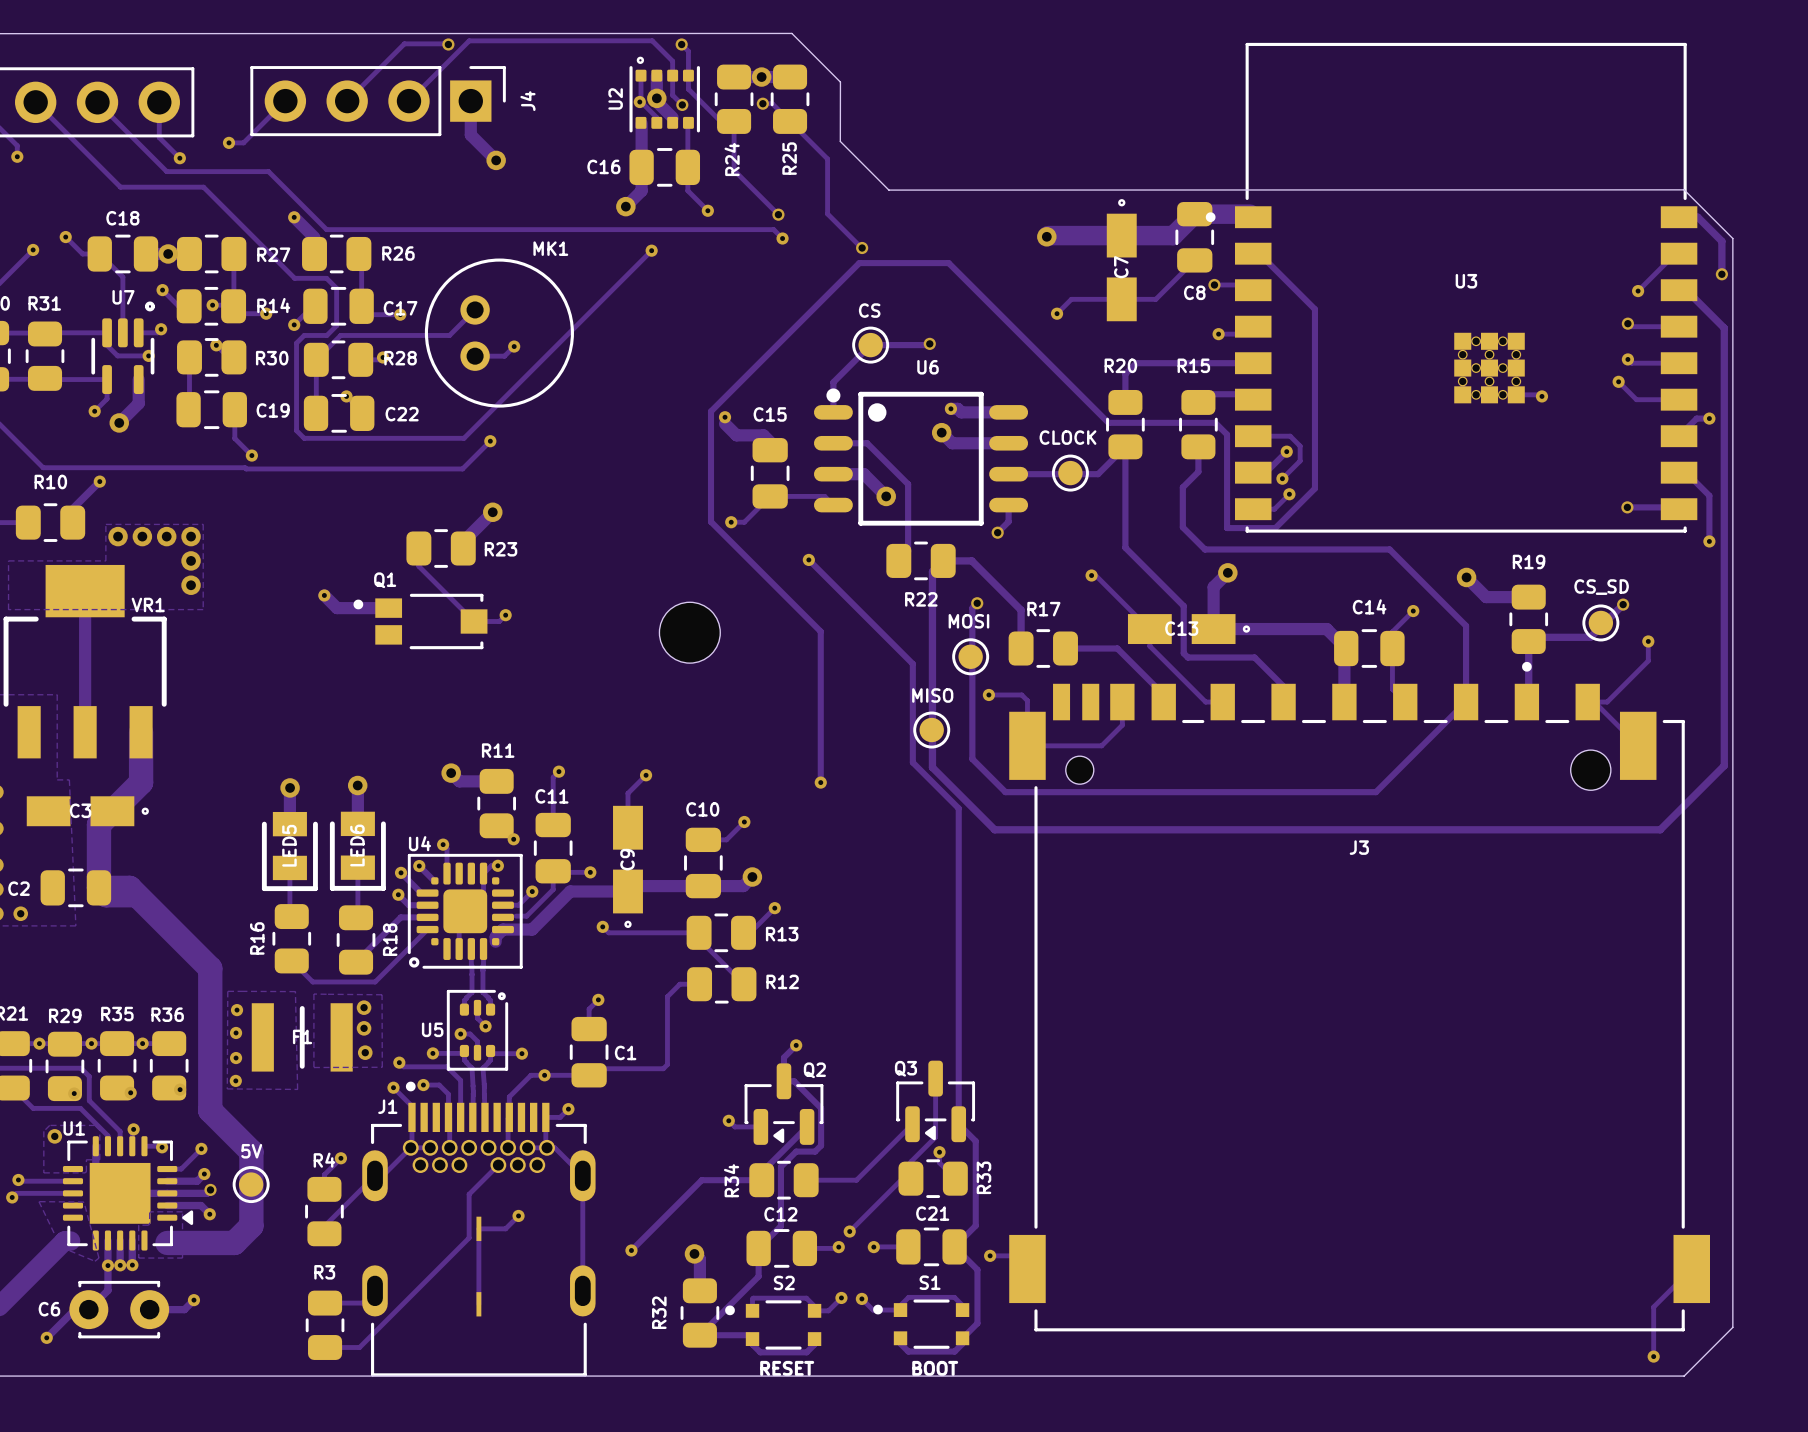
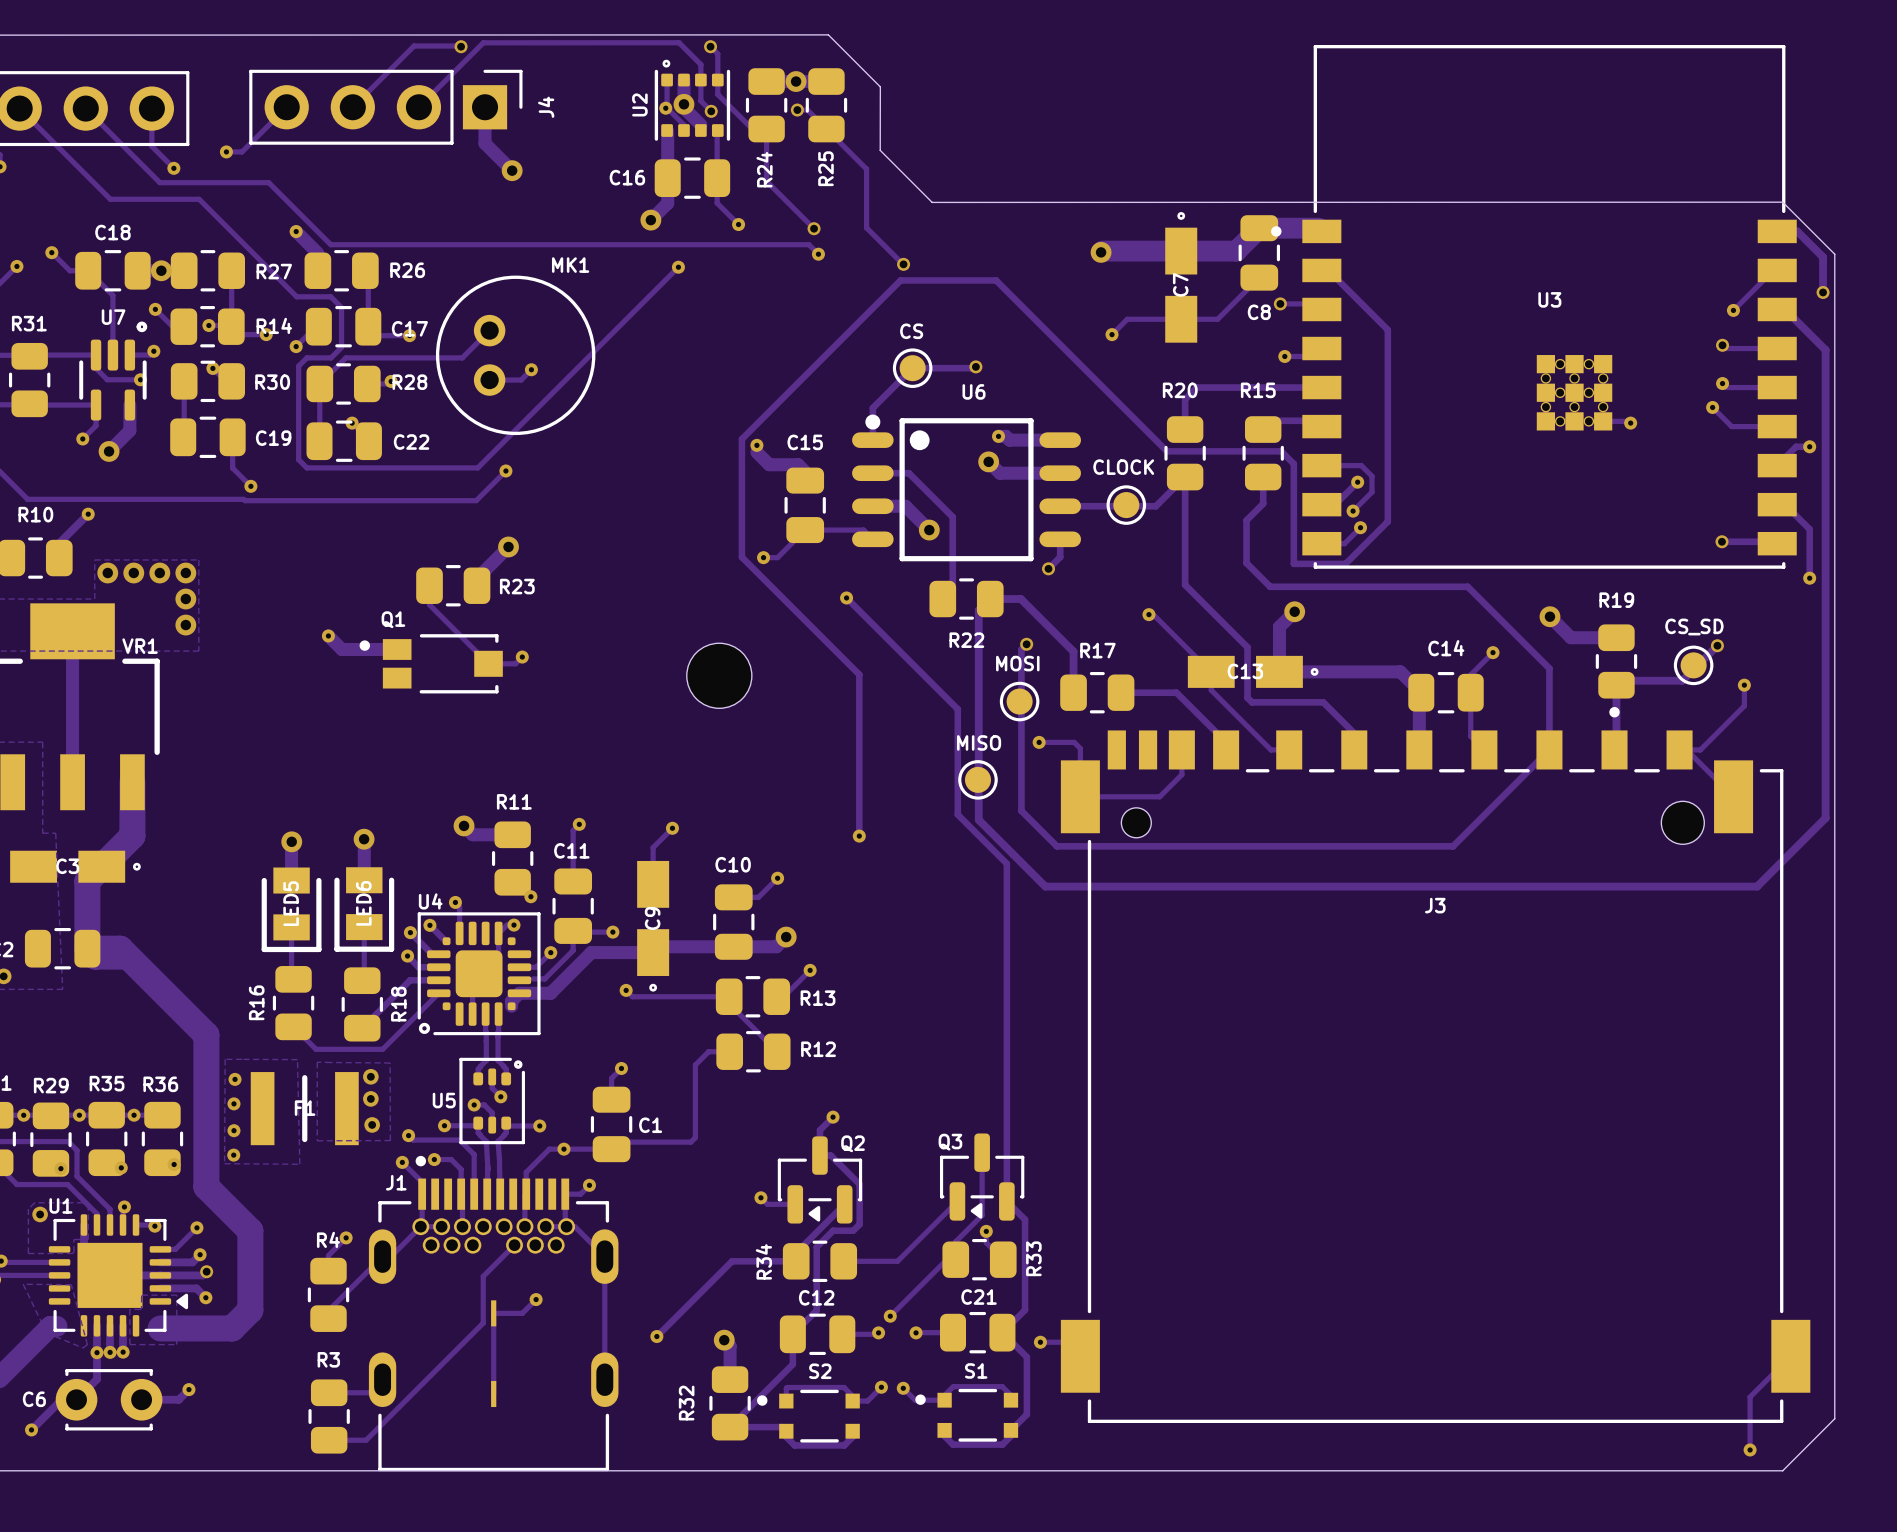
part: 5V (251, 1184) -> none
text: RESET (787, 1368) -> none
text: BOOT (935, 1368) -> none

